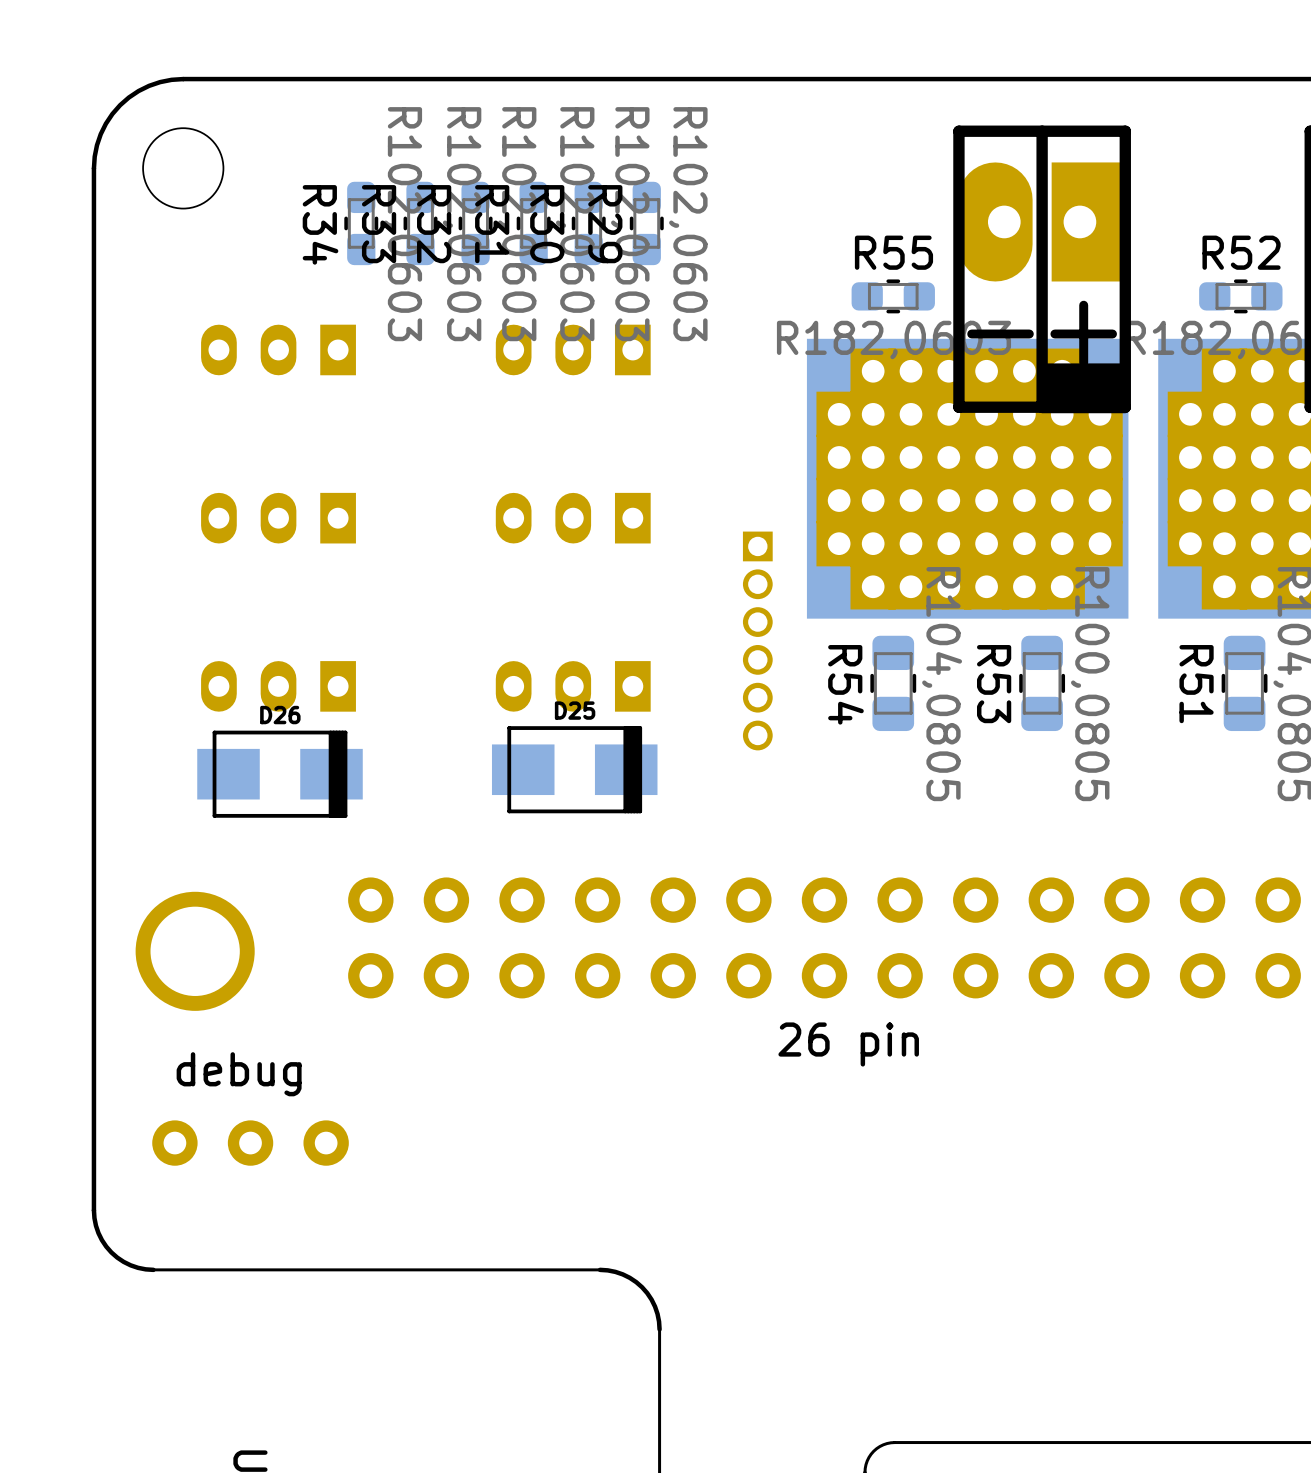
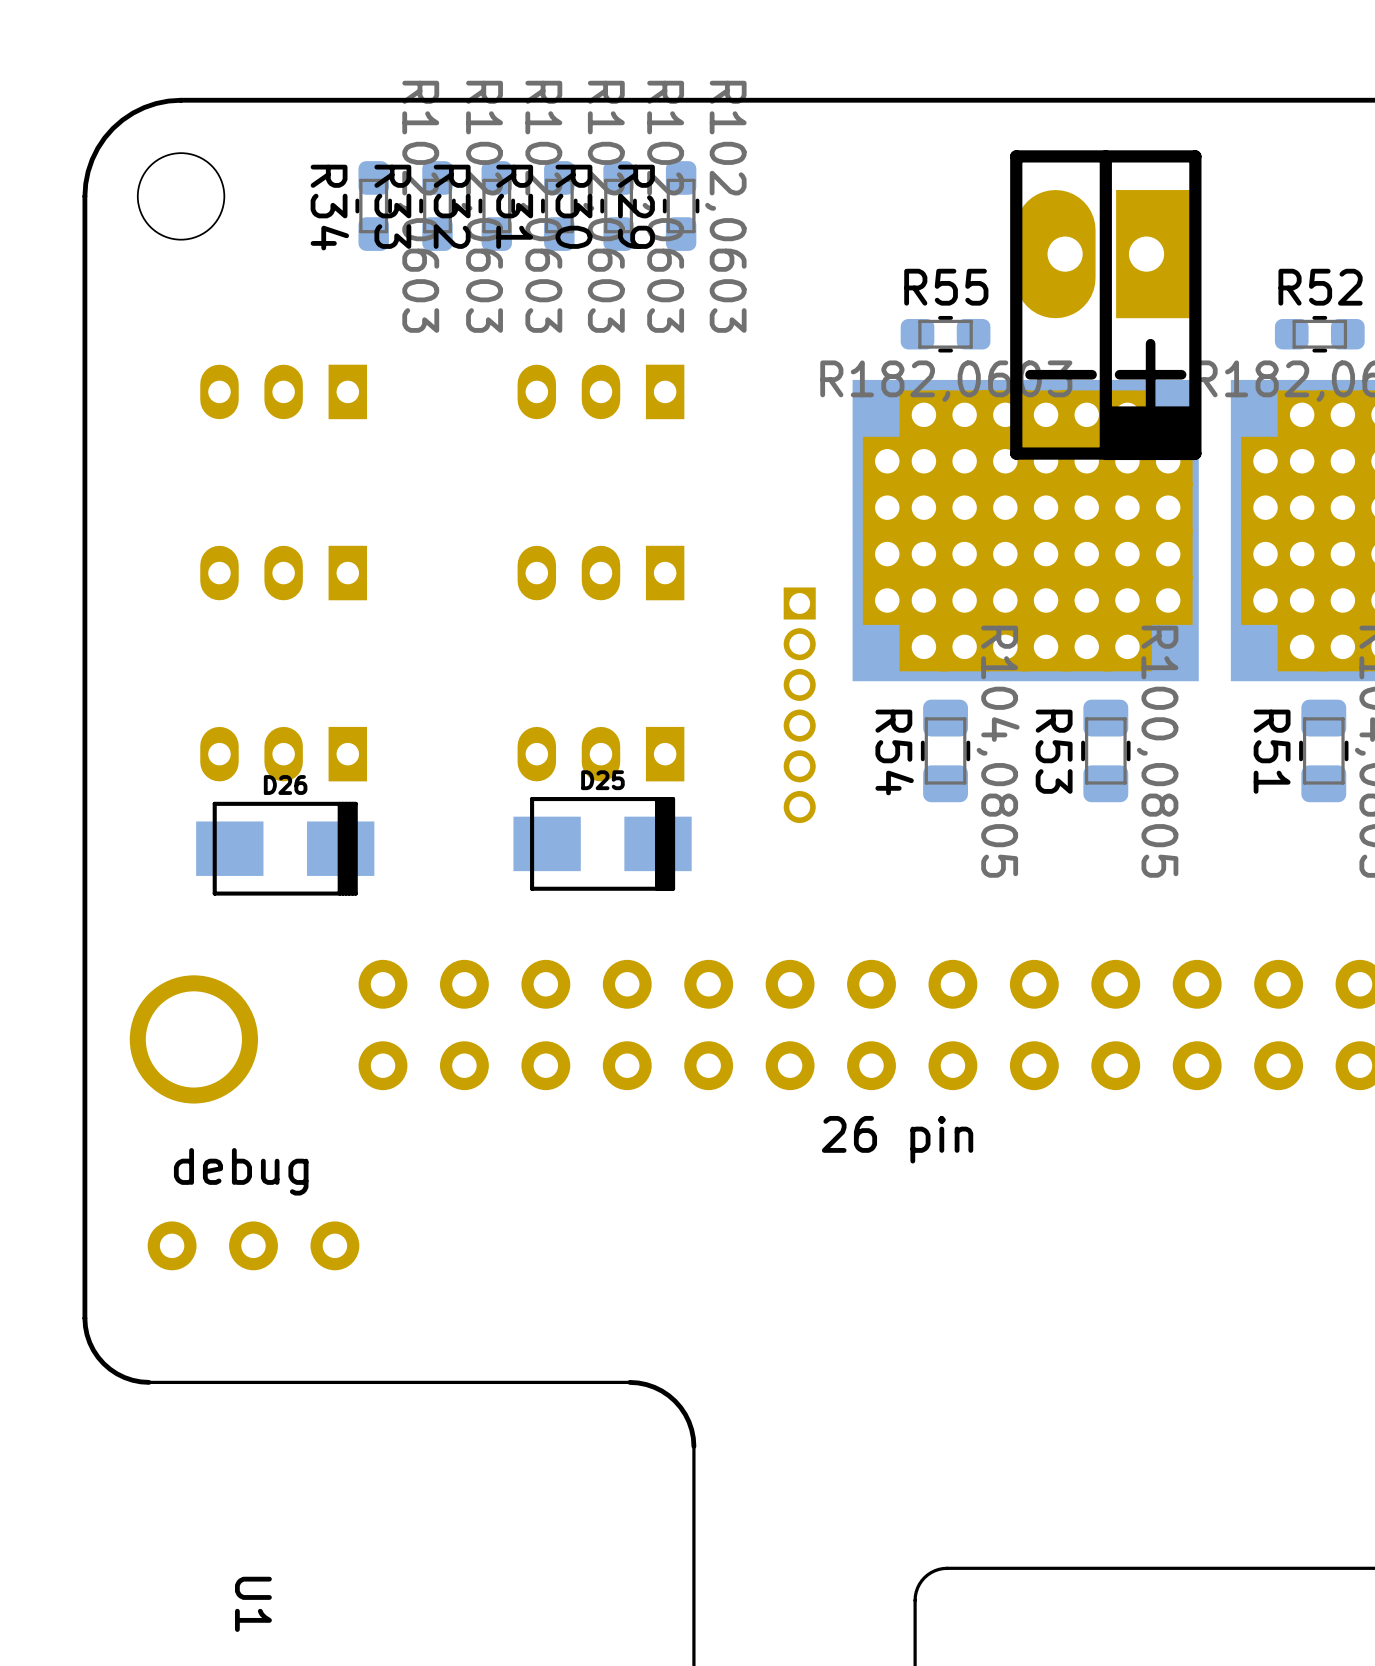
R34 position: (361, 223) -> (373, 206)
R33 position: (420, 223) -> (437, 206)
R32 position: (475, 223) -> (496, 206)
R31 position: (533, 223) -> (559, 206)
R30 position: (588, 223) -> (618, 206)
R29 position: (646, 223) -> (681, 206)

